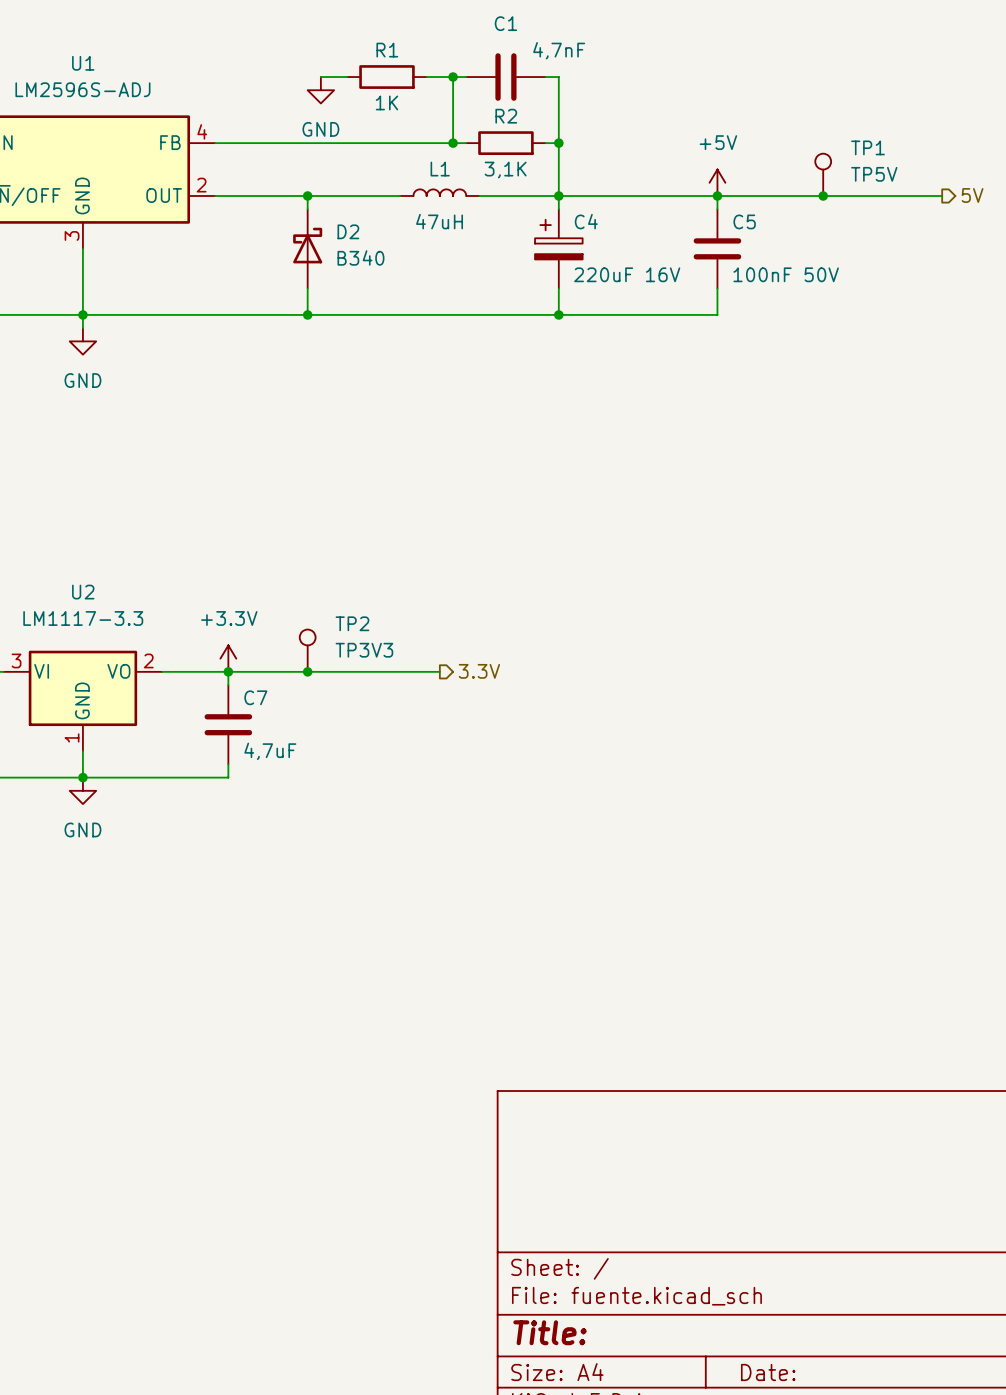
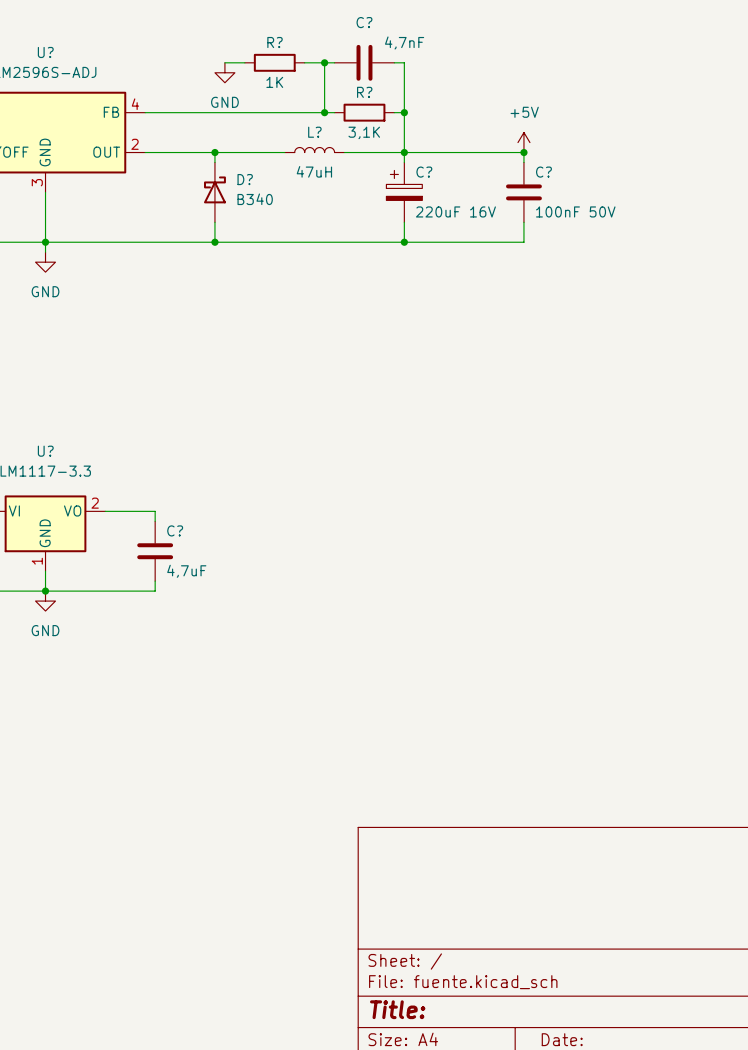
C1 name: C1 (505, 23) -> C? (364, 22)
R1 name: R1 (387, 50) -> R? (275, 42)
U1 name: U1 (83, 63) -> U? (45, 52)
R2 name: R2 (506, 116) -> R? (364, 92)
L1 name: L1 (440, 169) -> L? (314, 132)
TP1: TP5V (823, 174) -> none
wire: (717, 195) (942, 195) -> none
junction: (823, 195) -> none
hierarchical label: 5V (972, 195) -> none
C4 name: C4 (586, 221) -> C? (424, 172)
C5 name: C5 (744, 221) -> C? (543, 172)
D2 name: D2 (348, 231) -> D? (245, 179)
U2 name: U2 (83, 592) -> U? (45, 451)
TP2: TP3V3 (307, 650) -> none
power symbol: +3.3V (228, 658) -> none
wire: (228, 671) (439, 671) -> none
junction: (228, 671) -> none
junction: (307, 671) -> none
hierarchical label: 3.3V (479, 671) -> none
C7 name: C7 (255, 697) -> C? (175, 530)

